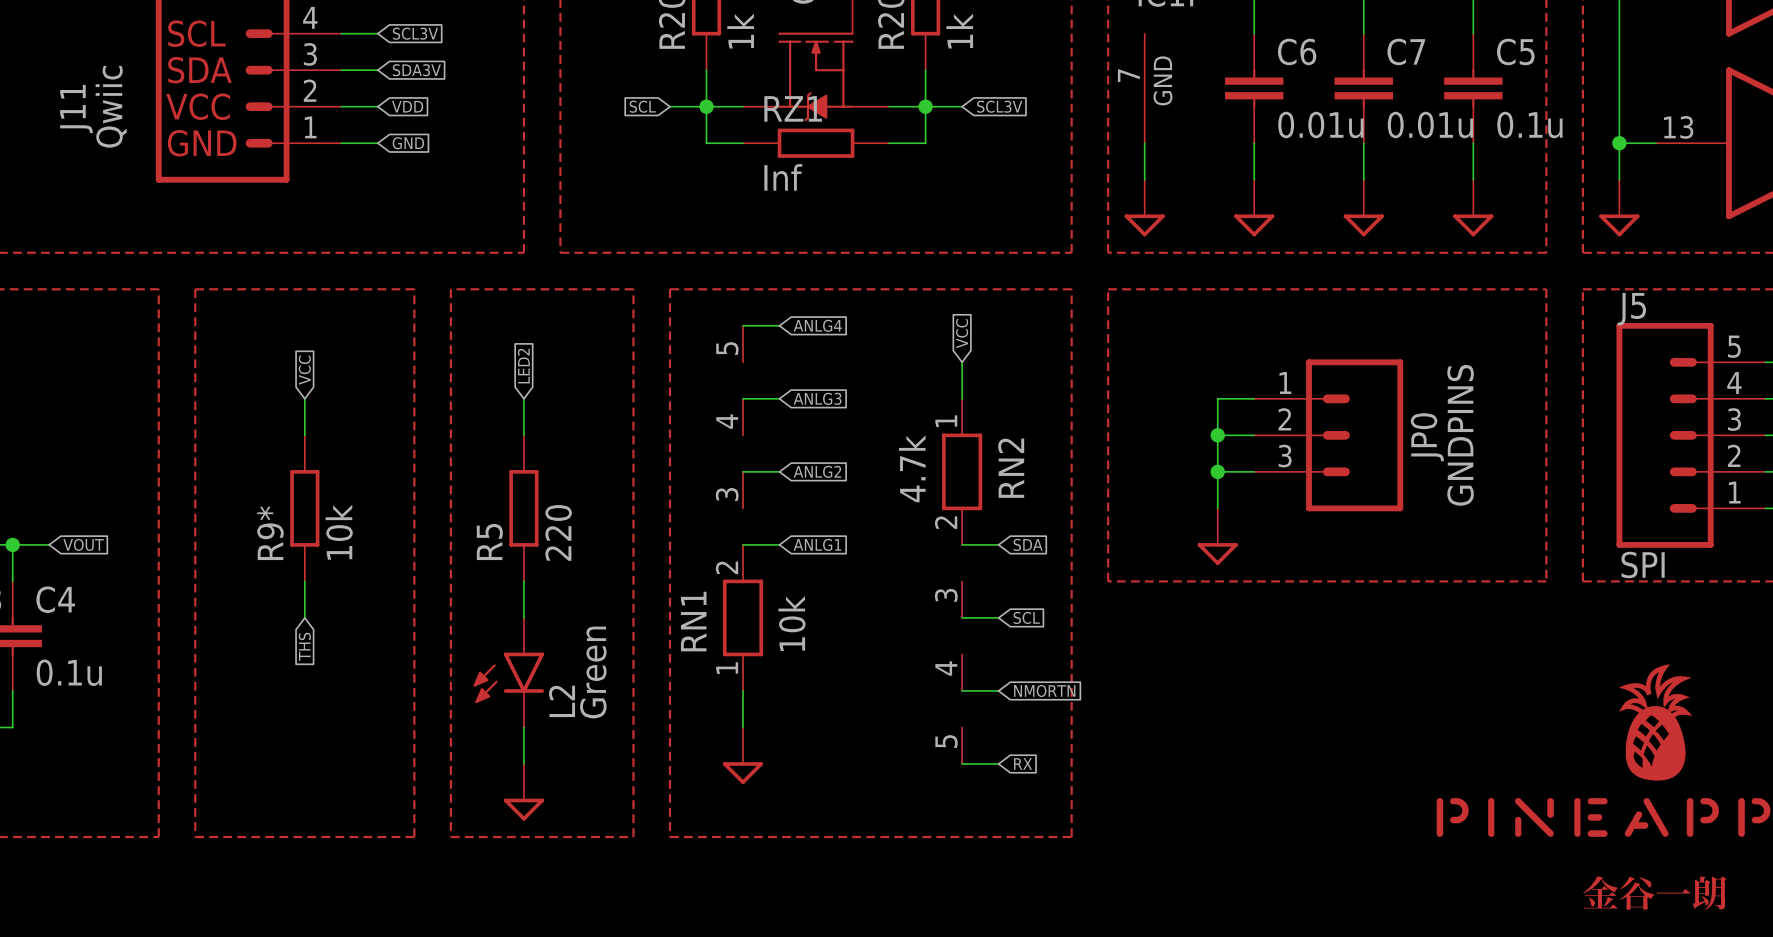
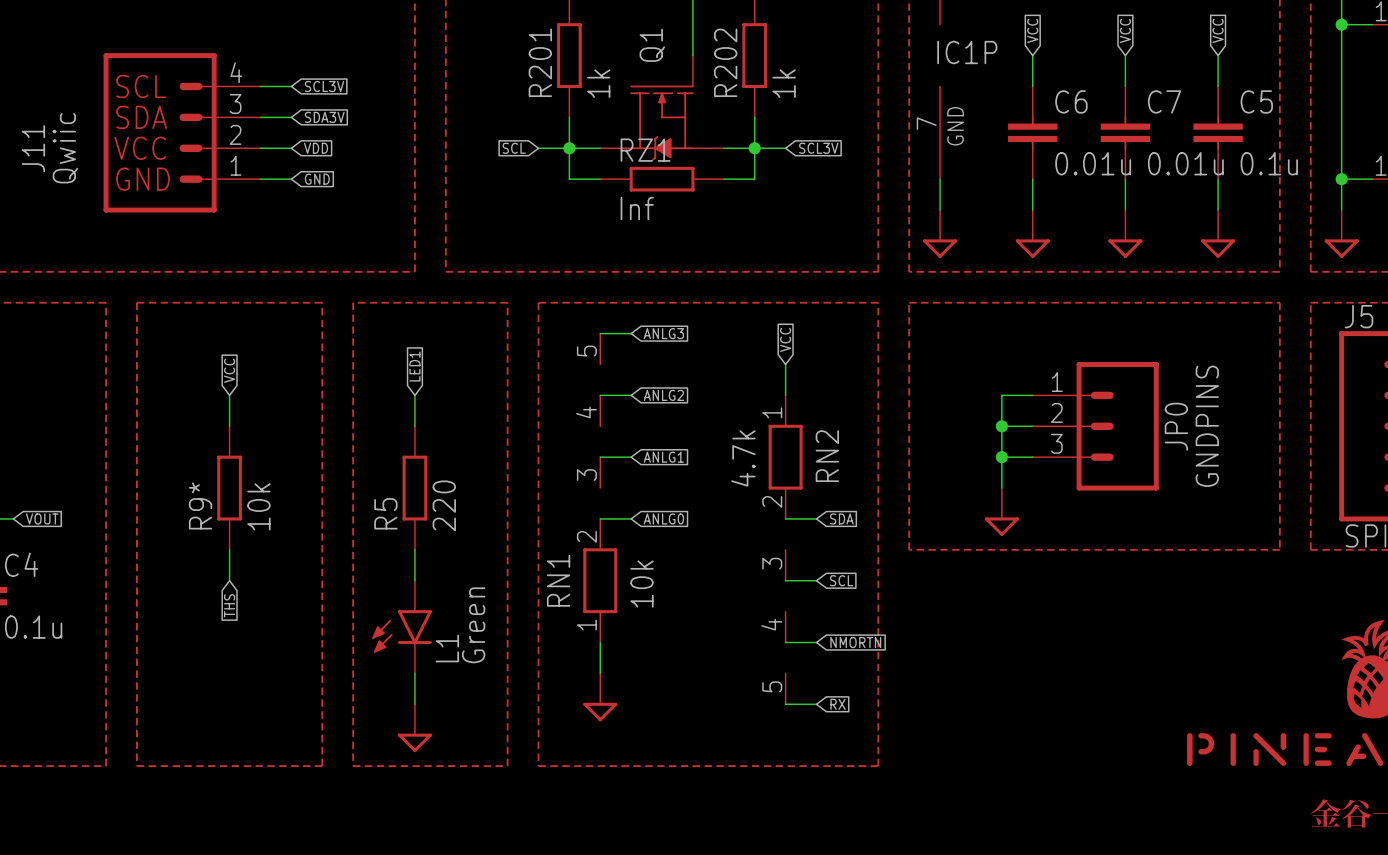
global label: ANLG4 (817, 325) -> ANLG3 (663, 333)
global label: LED2 (523, 366) -> LED1 (414, 366)
global label: ANLG3 (817, 398) -> ANLG2 (663, 395)
global label: ANLG2 (817, 471) -> ANLG1 (663, 457)
global label: ANLG1 (817, 544) -> ANLG0 (663, 518)
L2 name: L2 (562, 701) -> L1 (447, 648)

